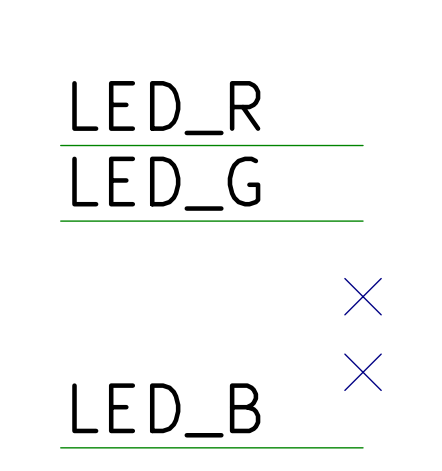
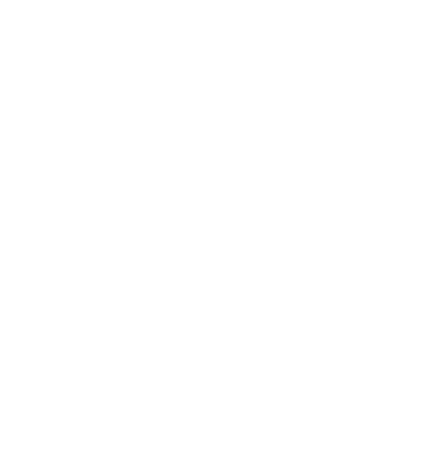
label: LED_R (166, 108) -> none
wire: (60, 145) (363, 145) -> none
label: LED_G (166, 183) -> none
wire: (60, 221) (363, 221) -> none
no-connect mark: (363, 296) -> none
no-connect mark: (363, 372) -> none
label: LED_B (166, 410) -> none
wire: (60, 447) (363, 447) -> none

